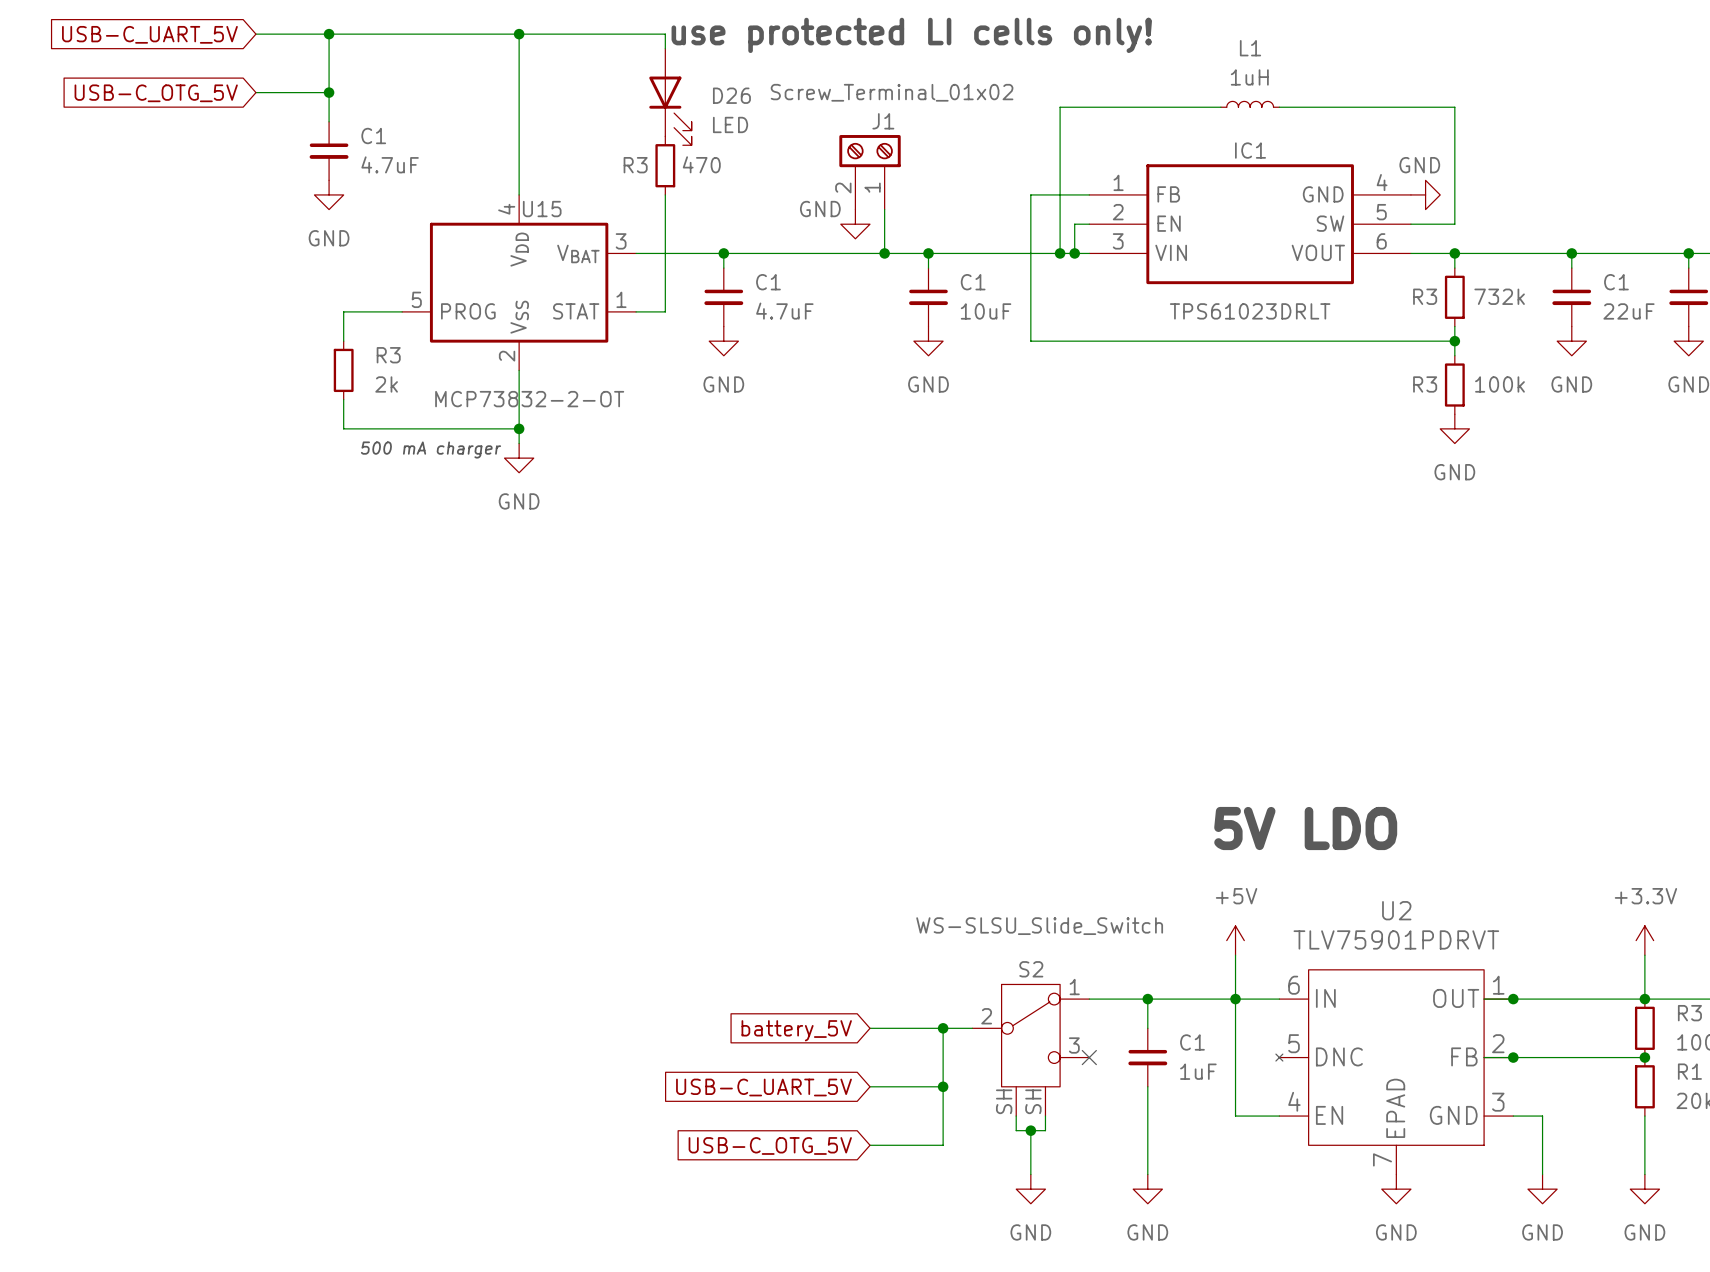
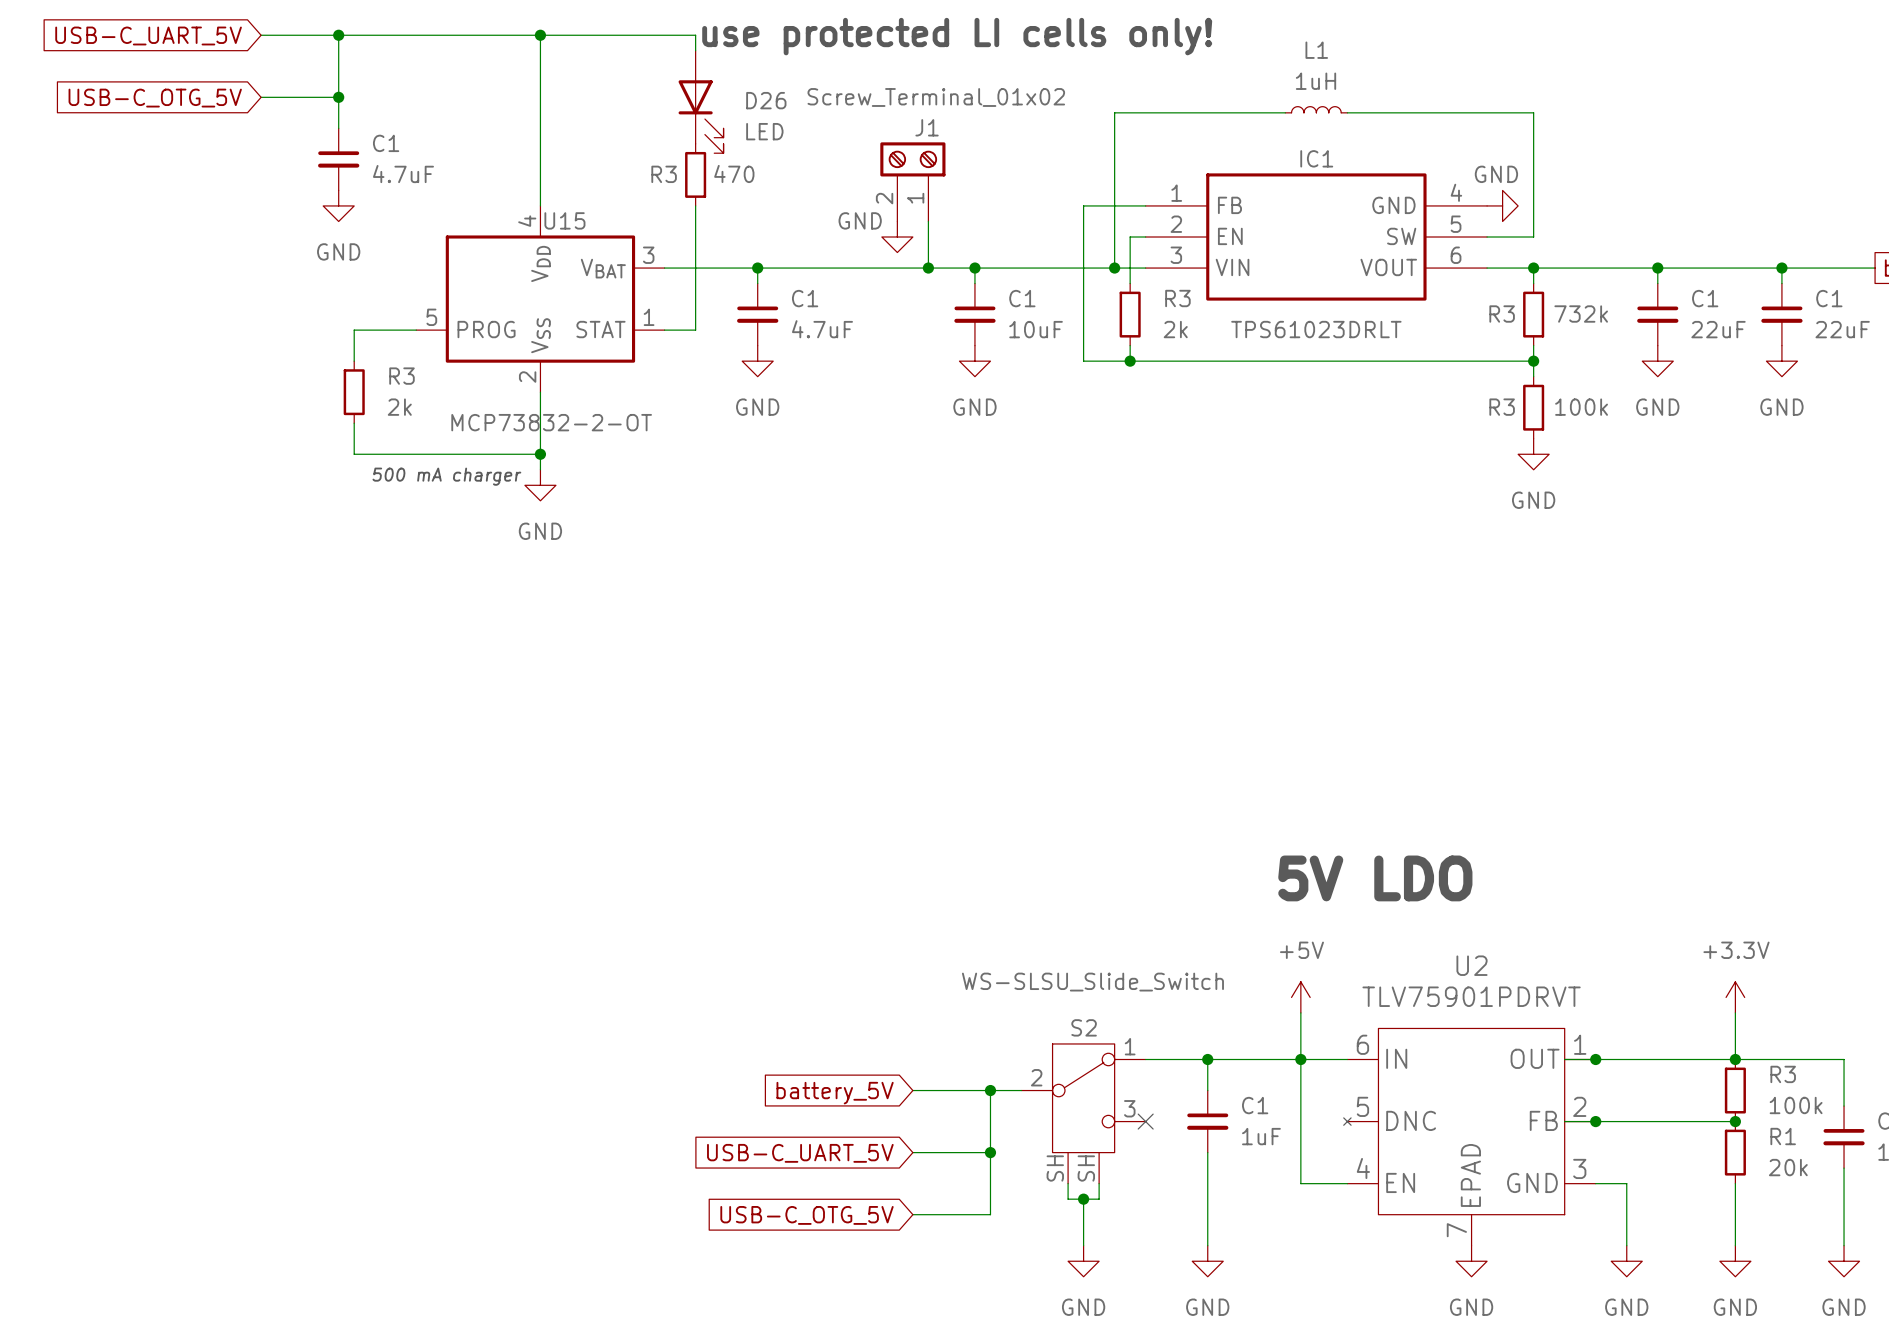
wire: none -> (1130, 268) (1130, 283)
junction: (1074, 253) -> none
R3: none -> 2k (1130, 314)
wire: none -> (1130, 345) (1130, 361)
junction: none -> (1130, 361)

